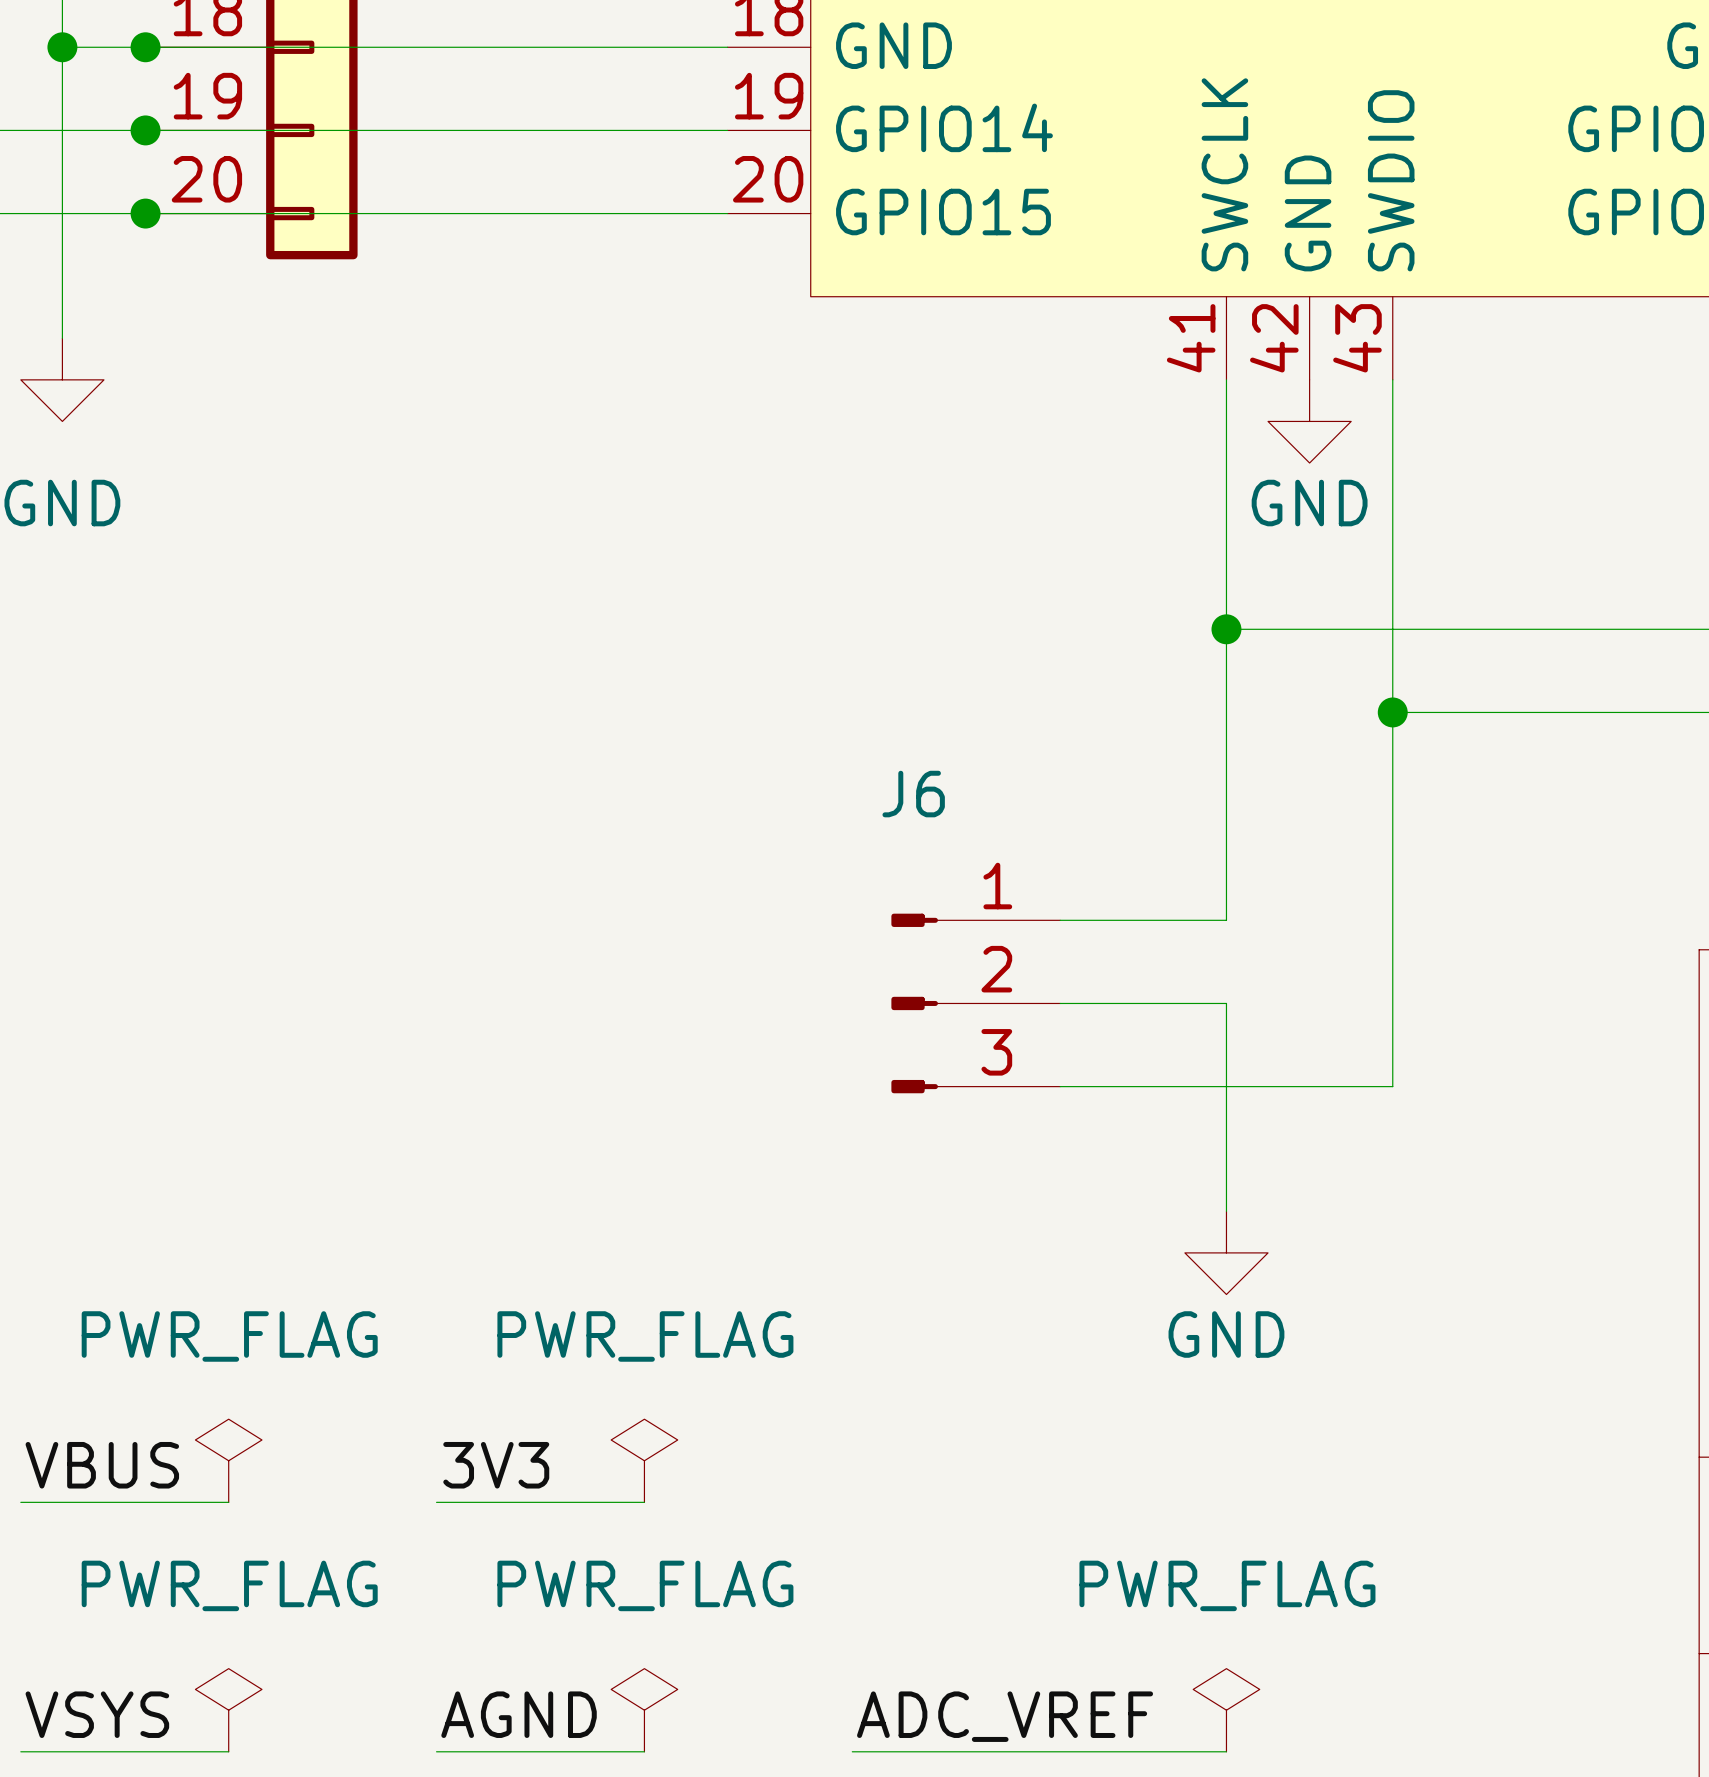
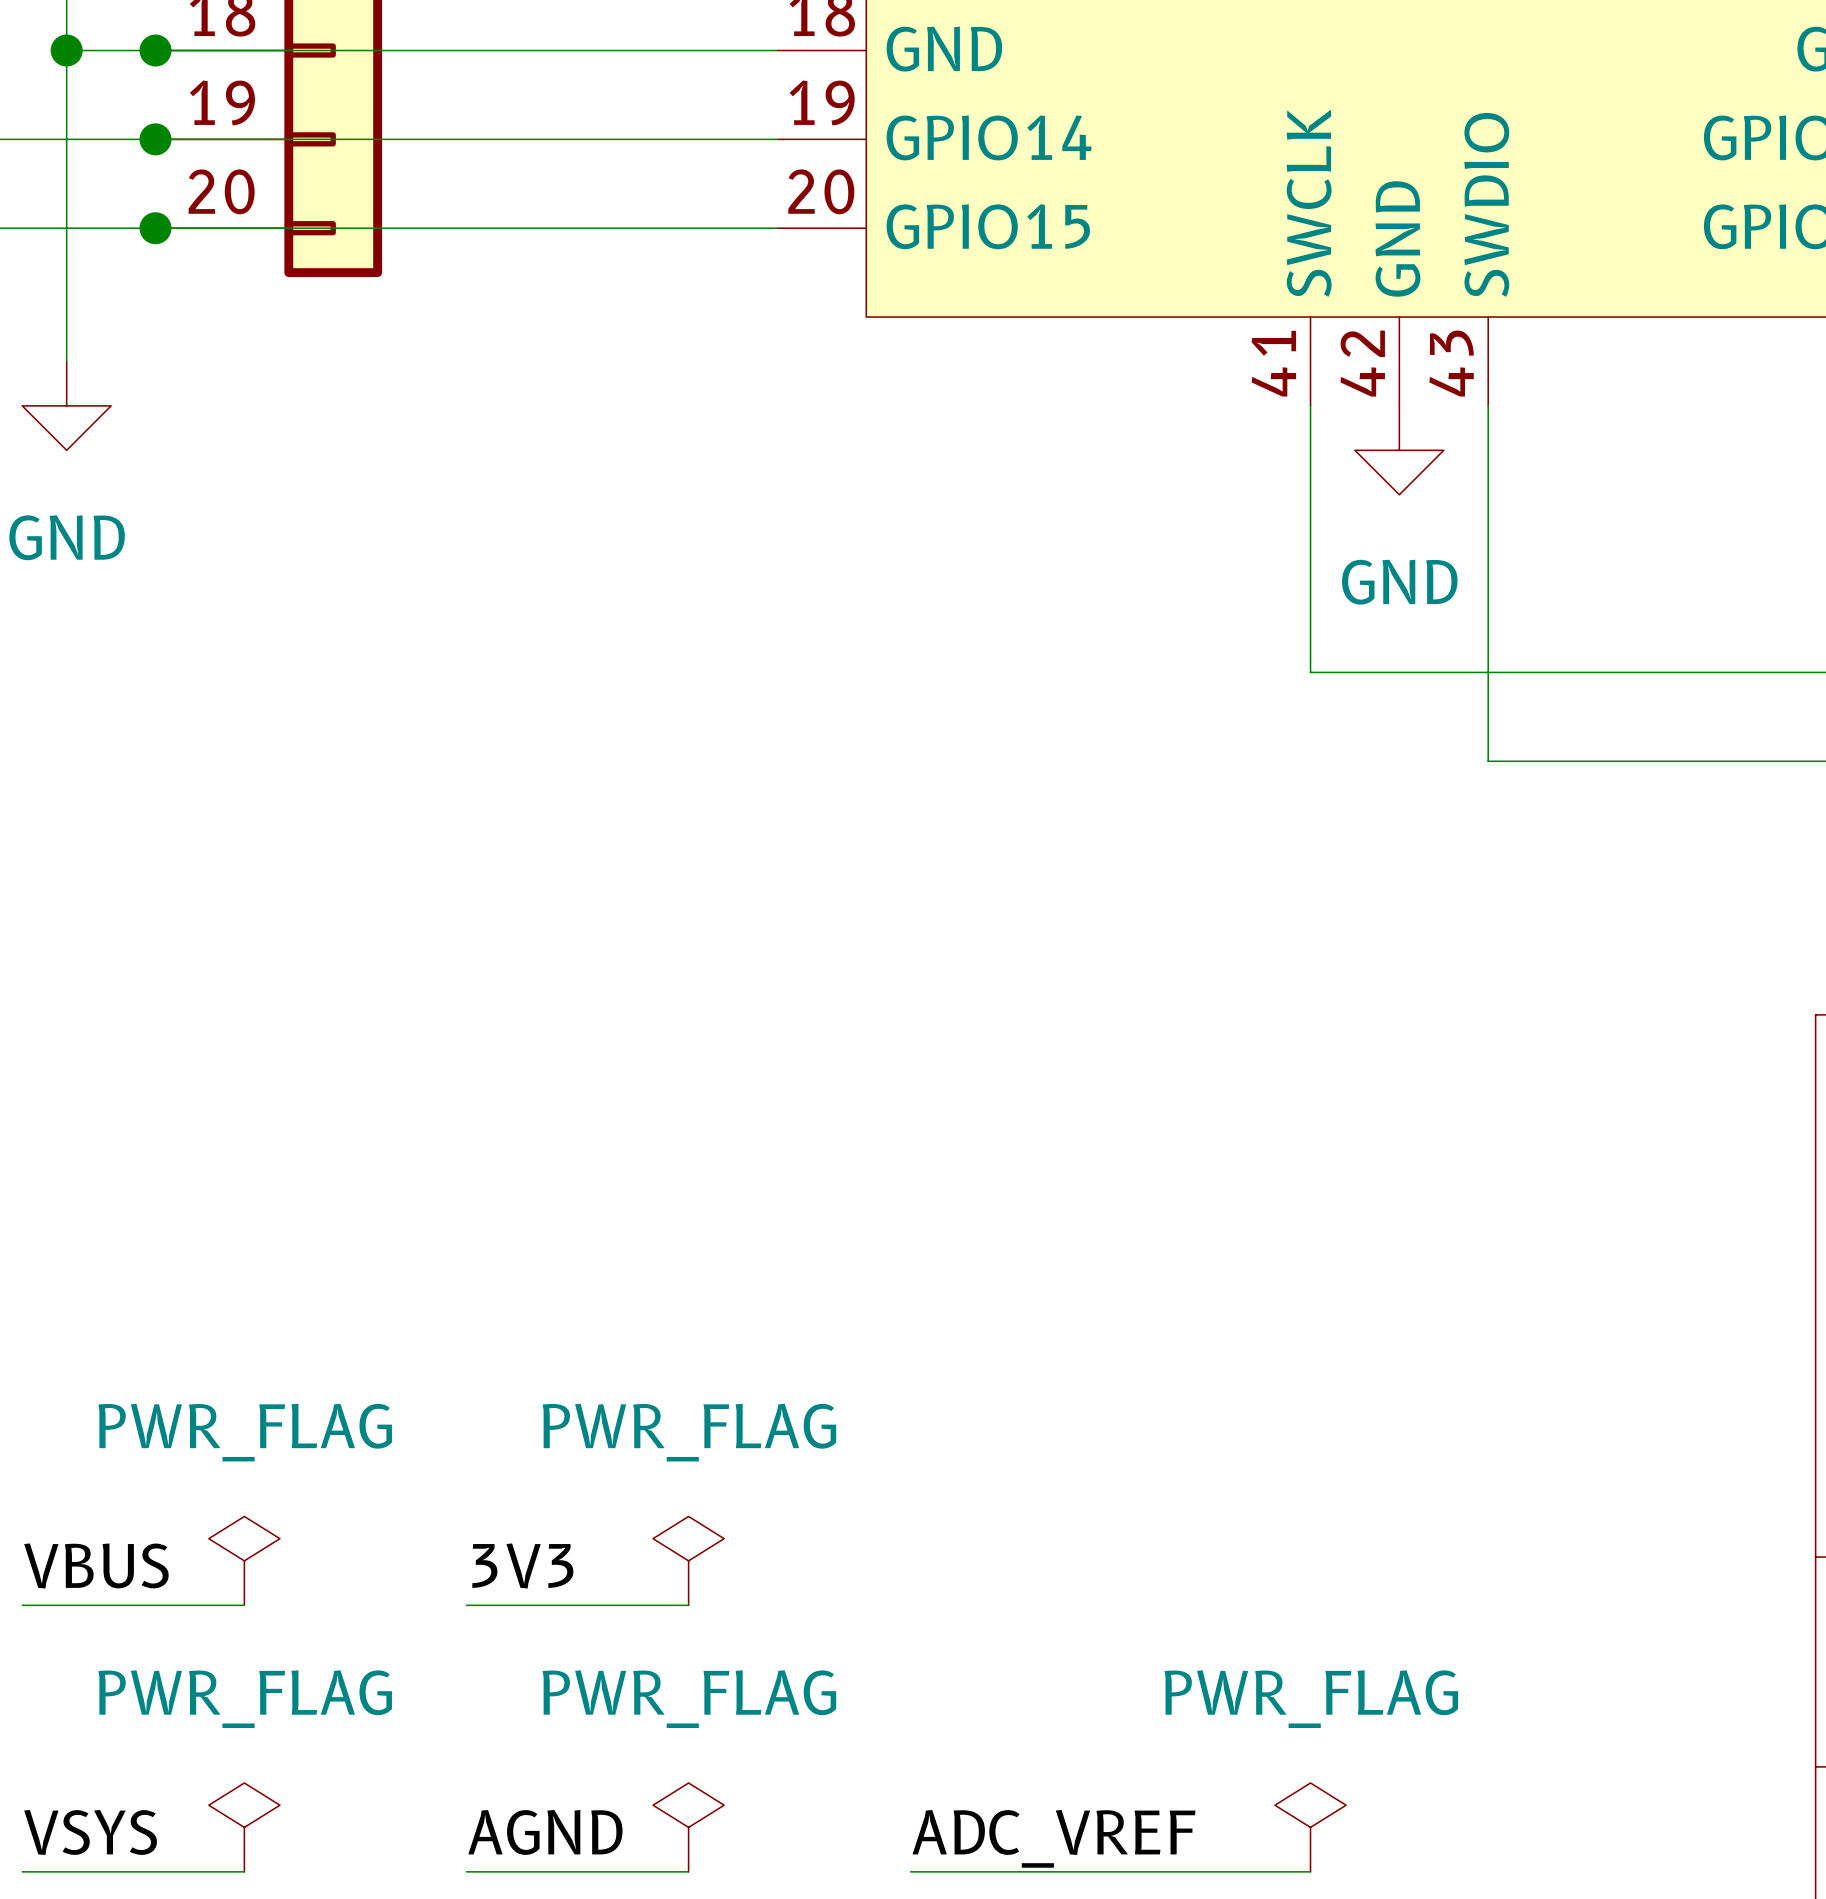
power symbol text position: GND (1309, 503) -> GND (1399, 582)
wire: (1226, 629) (1226, 920) (1060, 920) -> none
junction: (1226, 629) -> none
wire: (1392, 712) (1392, 1086) (1060, 1086) -> none
junction: (1392, 712) -> none
J6: (975, 1003) -> none
wire: (1060, 1003) (1226, 1003) (1226, 1211) -> none
power symbol: GND (1226, 1252) -> none

